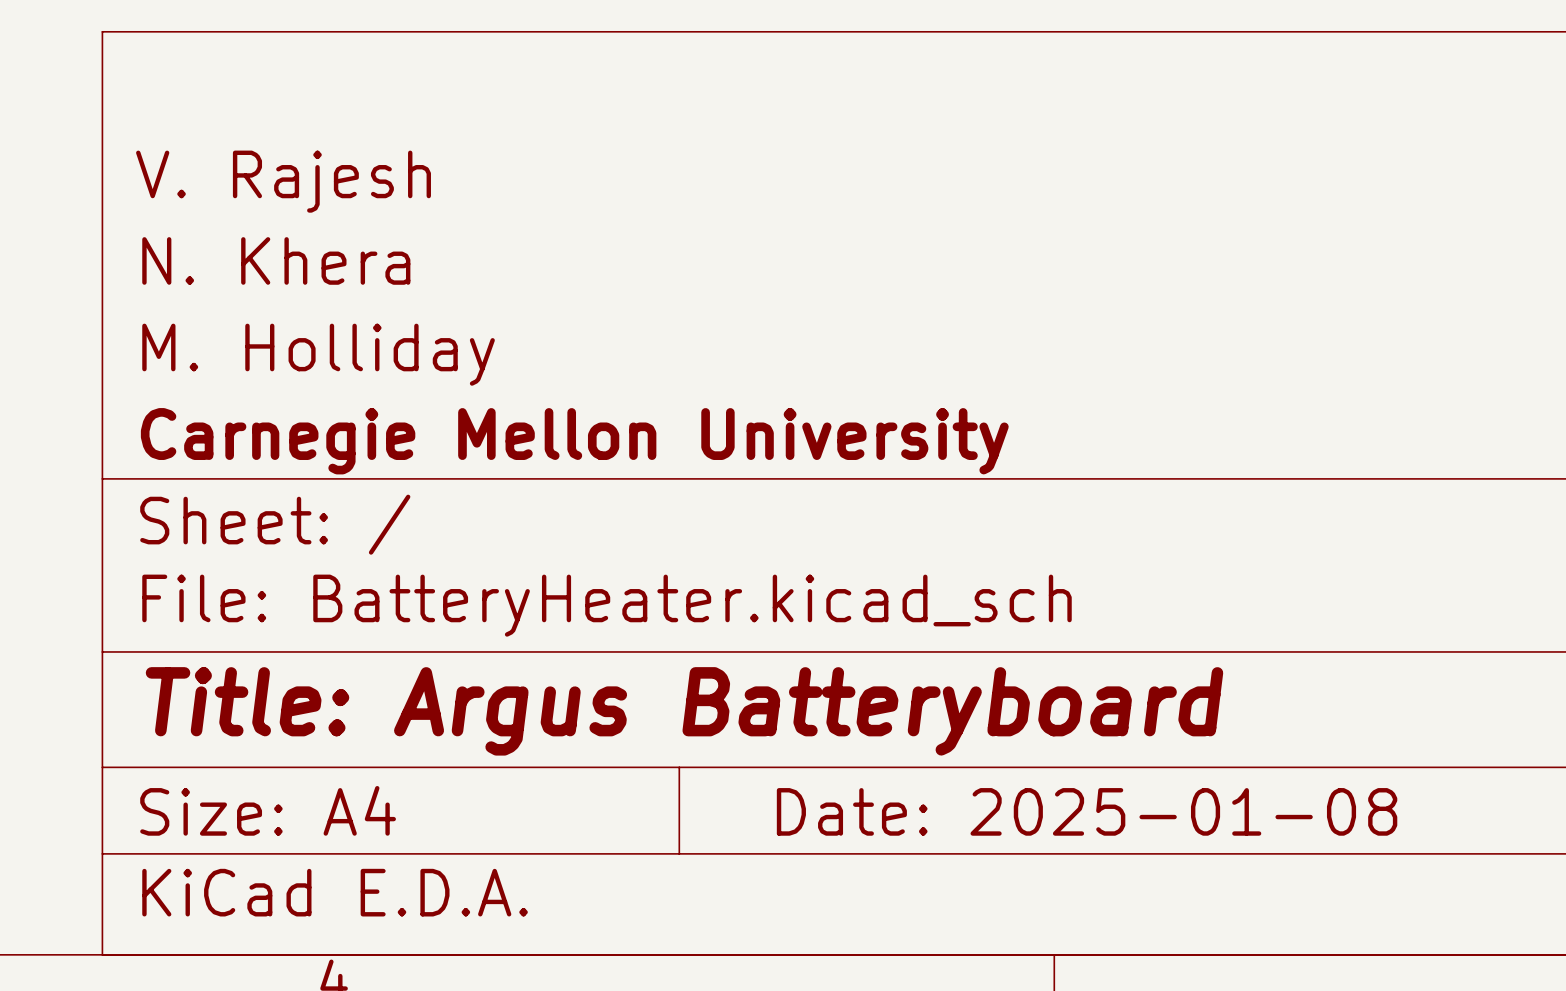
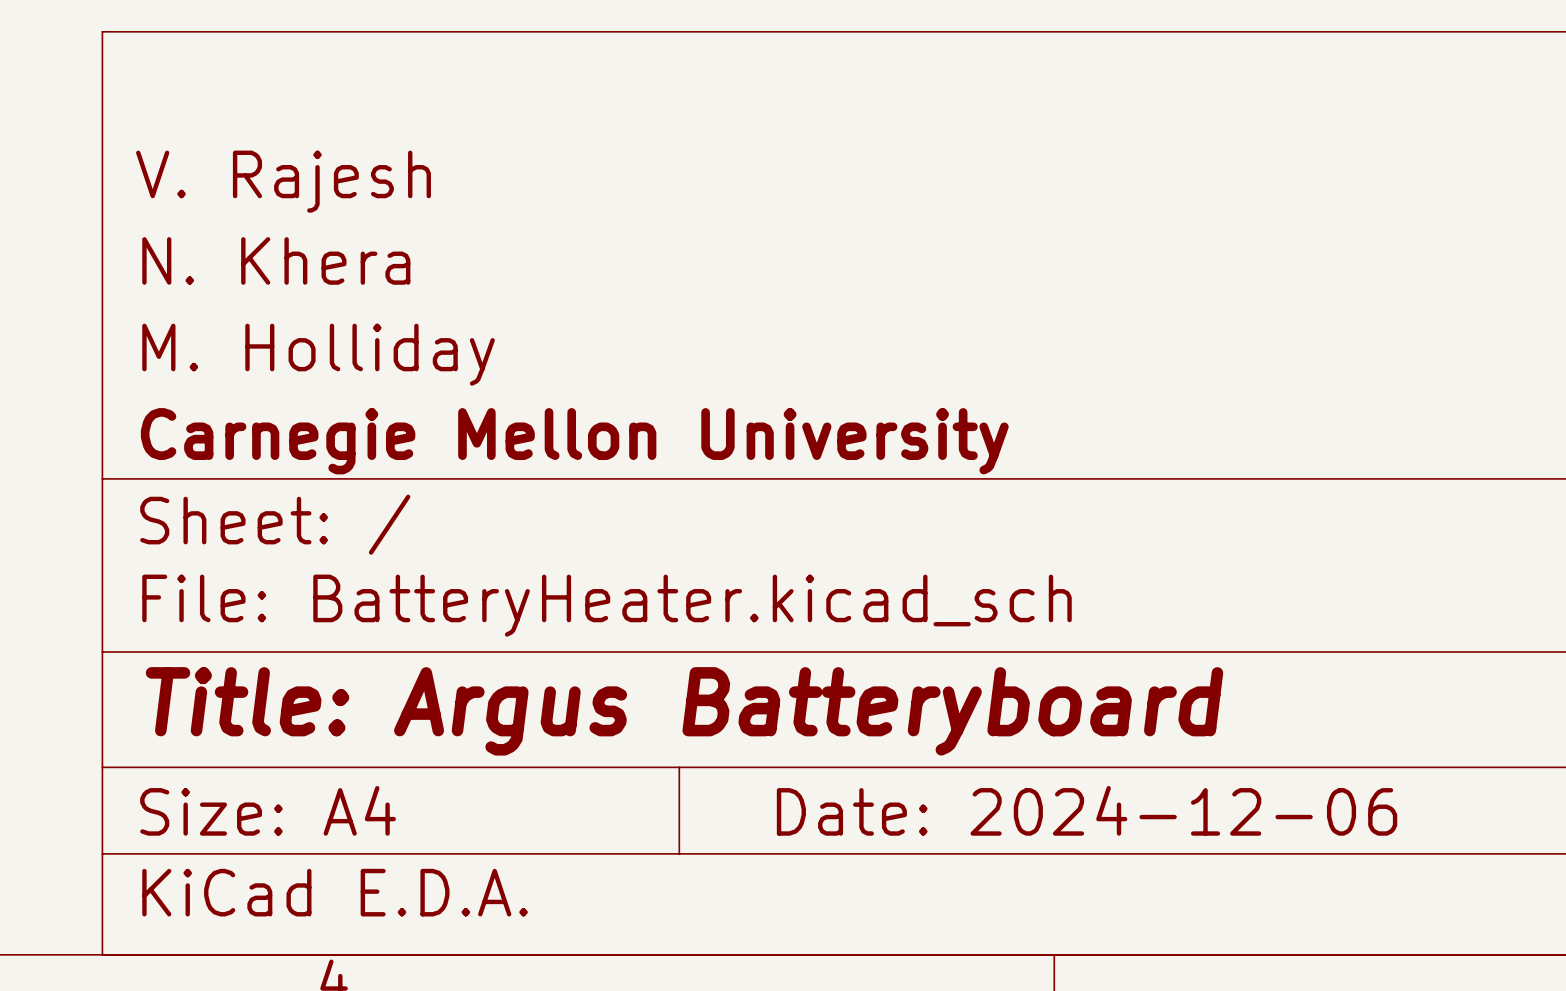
title block: Date: 2025-01-08 (1087, 811) -> Date: 2024-12-06 (1087, 810)

